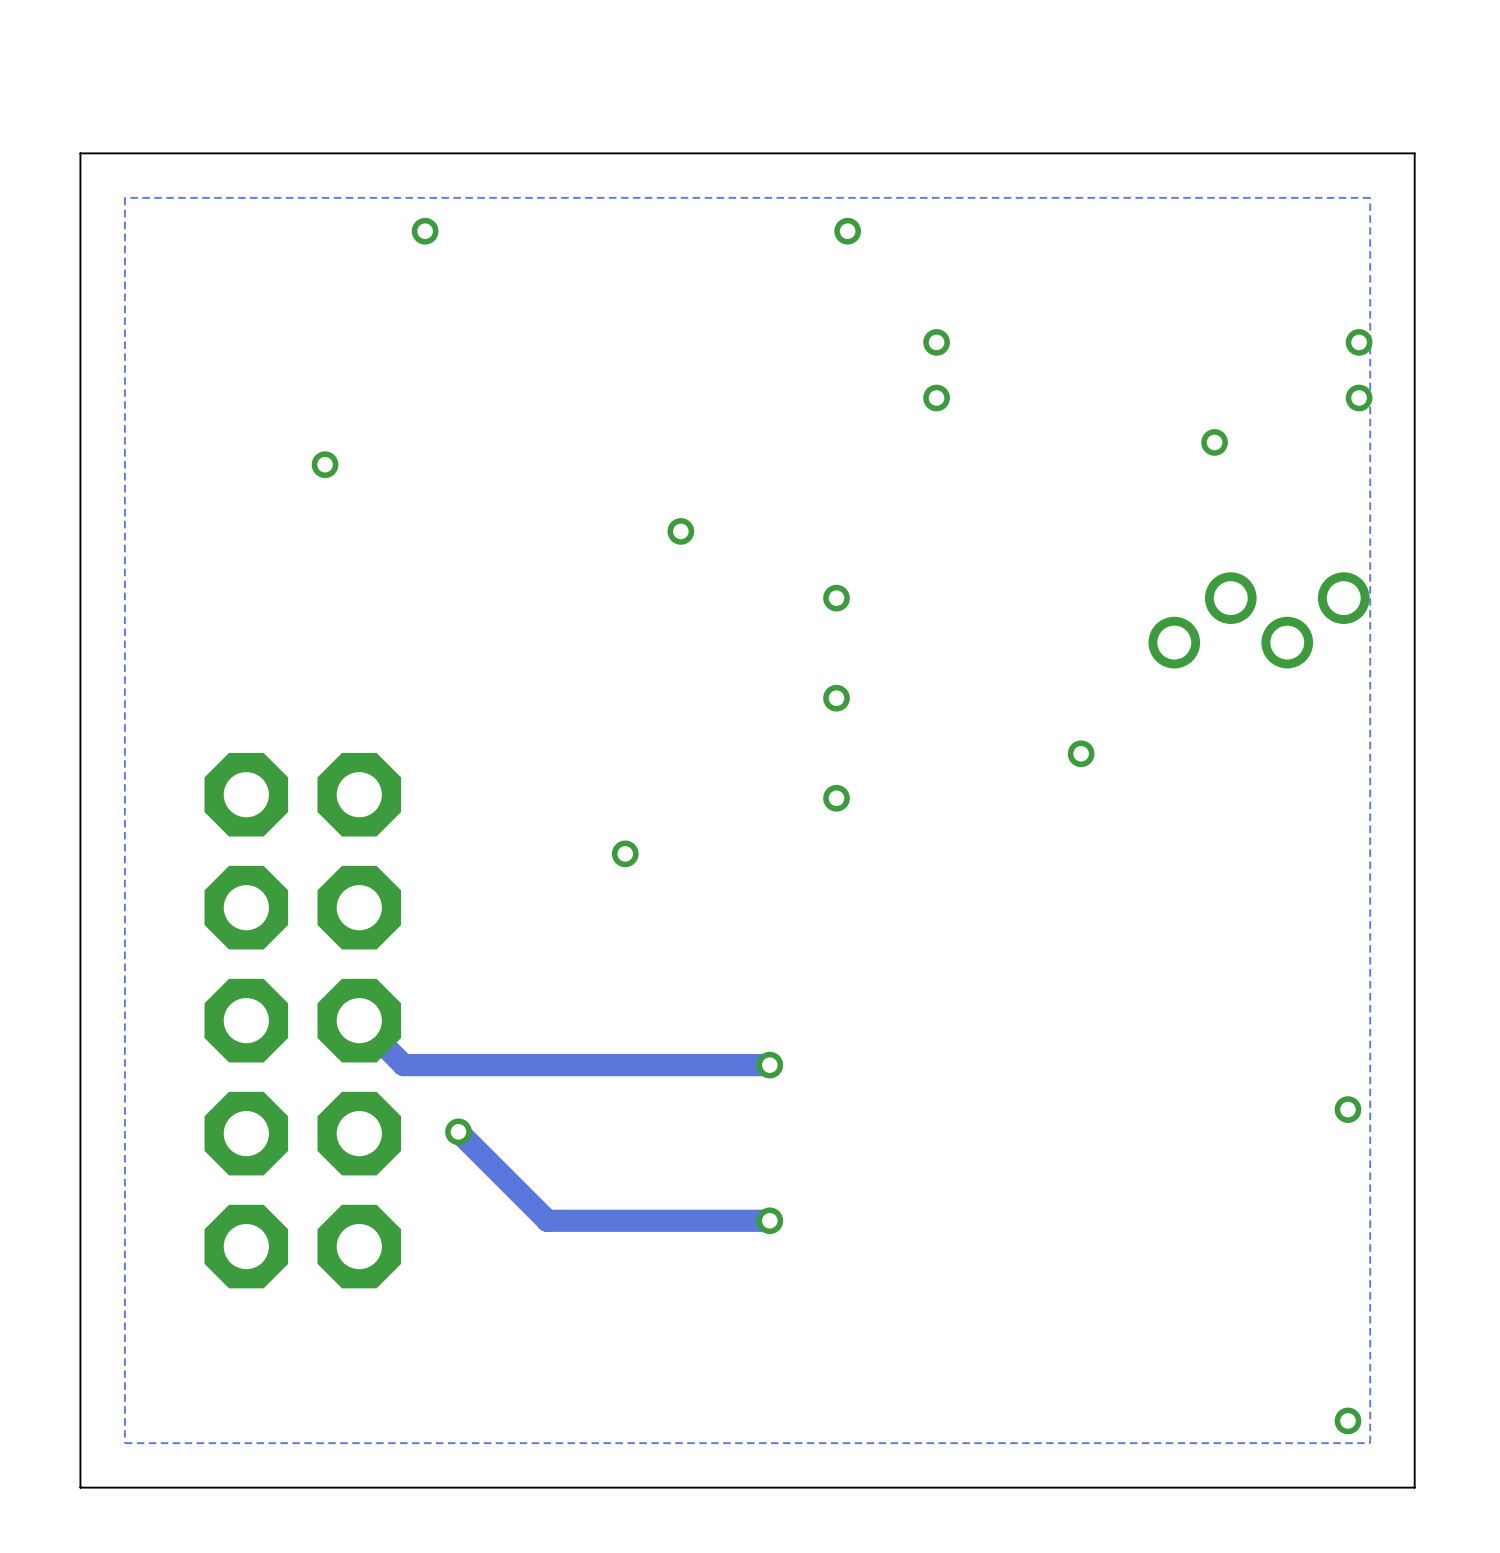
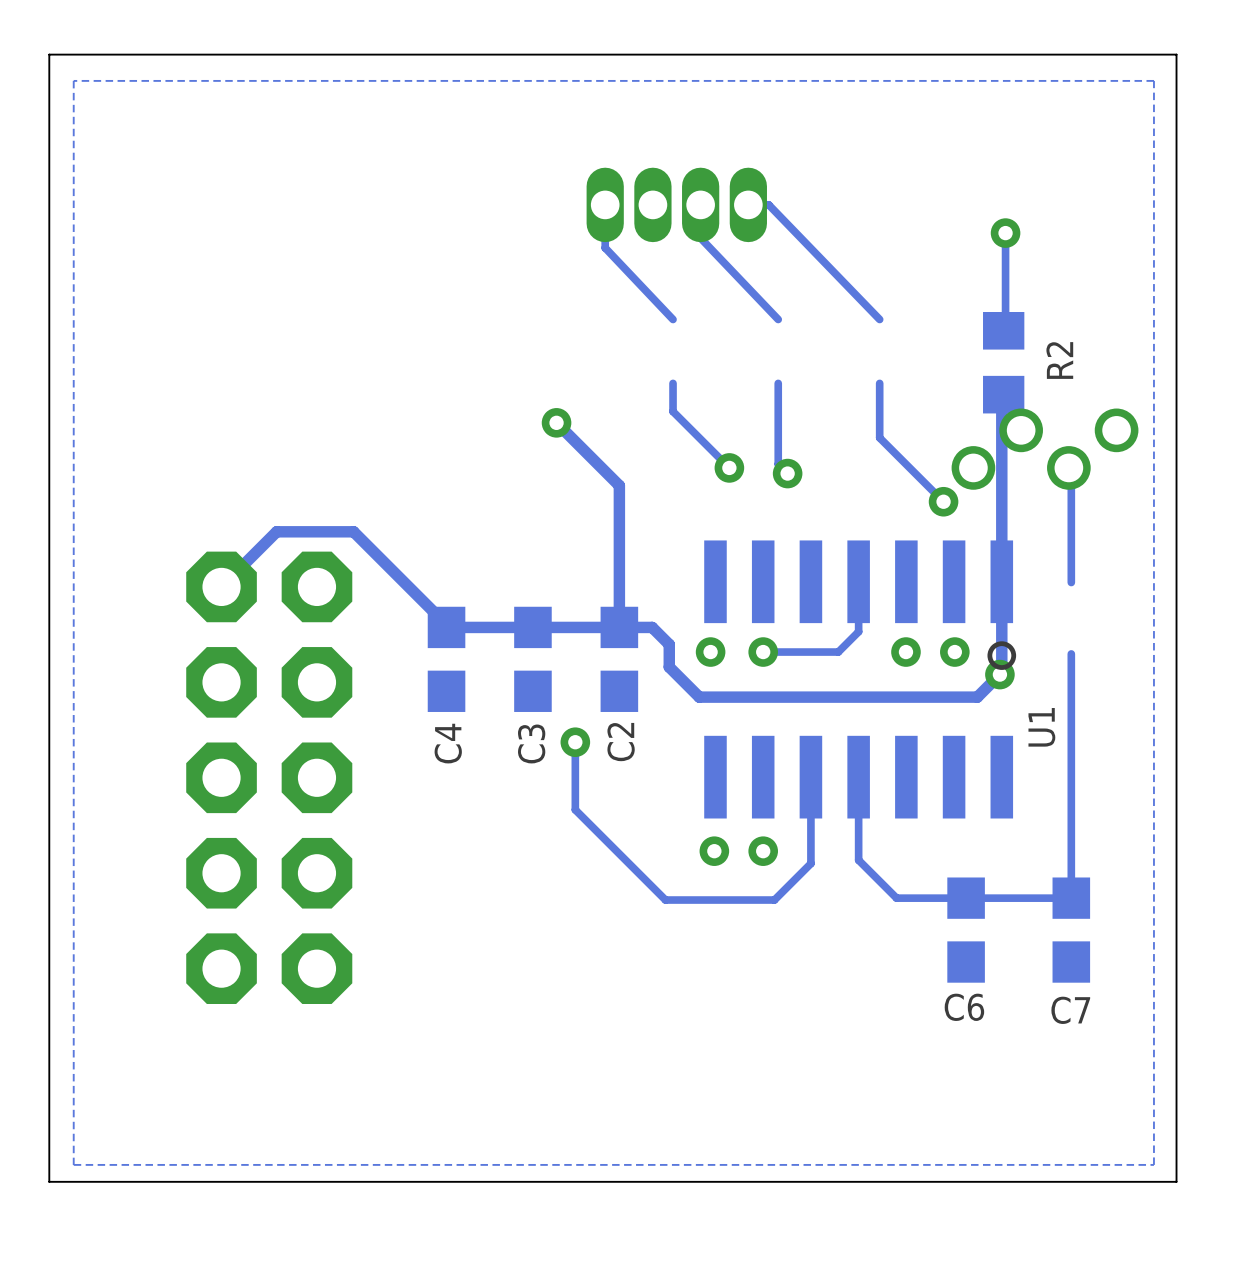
zone outline: (1370, 197) (1370, 1443) (124, 1443) (124, 197) (1370, 197) -> (1153, 80) (1153, 1164) (73, 1164) (73, 80) (1153, 80)
via: (425, 231) -> none
via: (847, 231) -> none
track: none -> (605, 204) (605, 247) (673, 319)
part: none -> (676, 204)
track: none -> (700, 204) (700, 238) (778, 319)
track: none -> (748, 204) (768, 204) (879, 319)
via: (936, 342) -> none
via: (1359, 342) -> none
track: none -> (1005, 233) (1005, 325) (1003, 330)
via: none -> (1005, 233)
via: (936, 397) -> none
via: (1359, 397) -> none
via: (1214, 442) -> none
via: (325, 464) -> none
R2: none -> (1003, 362)
via: (680, 531) -> none
track: none -> (673, 383) (673, 411) (729, 467)
track: none -> (778, 383) (778, 464) (787, 473)
track: none -> (879, 383) (879, 437) (943, 501)
track: none -> (1003, 394) (1001, 400) (1001, 672) (977, 697) (699, 697) (669, 667) (669, 644) (652, 627) (449, 627) (353, 531) (276, 531) (221, 586)
track: none -> (556, 422) (619, 485) (619, 627)
via: none -> (556, 422)
via: (836, 598) -> none
via: none -> (729, 467)
track: none -> (1084, 472) (1071, 485) (1071, 582)
via: none -> (787, 473)
via: none -> (943, 501)
via: (836, 698) -> none
via: (1081, 753) -> none
track: none -> (858, 581) (858, 631) (838, 652) (763, 652)
via: (836, 798) -> none
via: (625, 853) -> none
via: none -> (710, 652)
via: none -> (763, 652)
via: none -> (905, 652)
via: none -> (954, 652)
track: none -> (1071, 653) (1071, 898) (896, 898) (858, 860) (858, 777)
C4: none -> (446, 659)
C3: none -> (532, 659)
C2: none -> (619, 659)
via: none -> (999, 674)
U1: none -> (860, 679)
track: none -> (575, 742) (575, 809) (665, 900) (774, 900) (810, 863) (810, 777)
via: none -> (575, 742)
part position: (302, 1020) -> (269, 777)
track: (359, 1020) (403, 1065) (769, 1065) -> none
via: (769, 1065) -> none
via: none -> (714, 851)
via: none -> (763, 851)
via: (1347, 1109) -> none
track: (458, 1131) (547, 1220) (769, 1220) -> none
via: (458, 1131) -> none
C6: none -> (966, 930)
C7: none -> (1071, 930)
via: (769, 1220) -> none
via: (1347, 1420) -> none

